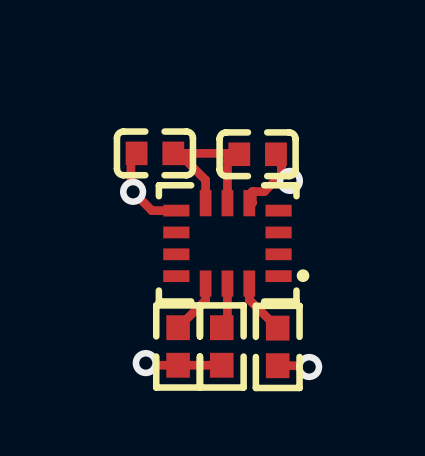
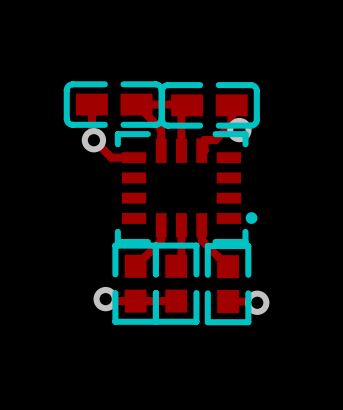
part footprint: [113, 128, 197, 179] -> [63, 81, 165, 128]
part footprint: [216, 129, 299, 180] -> [158, 82, 260, 129]

